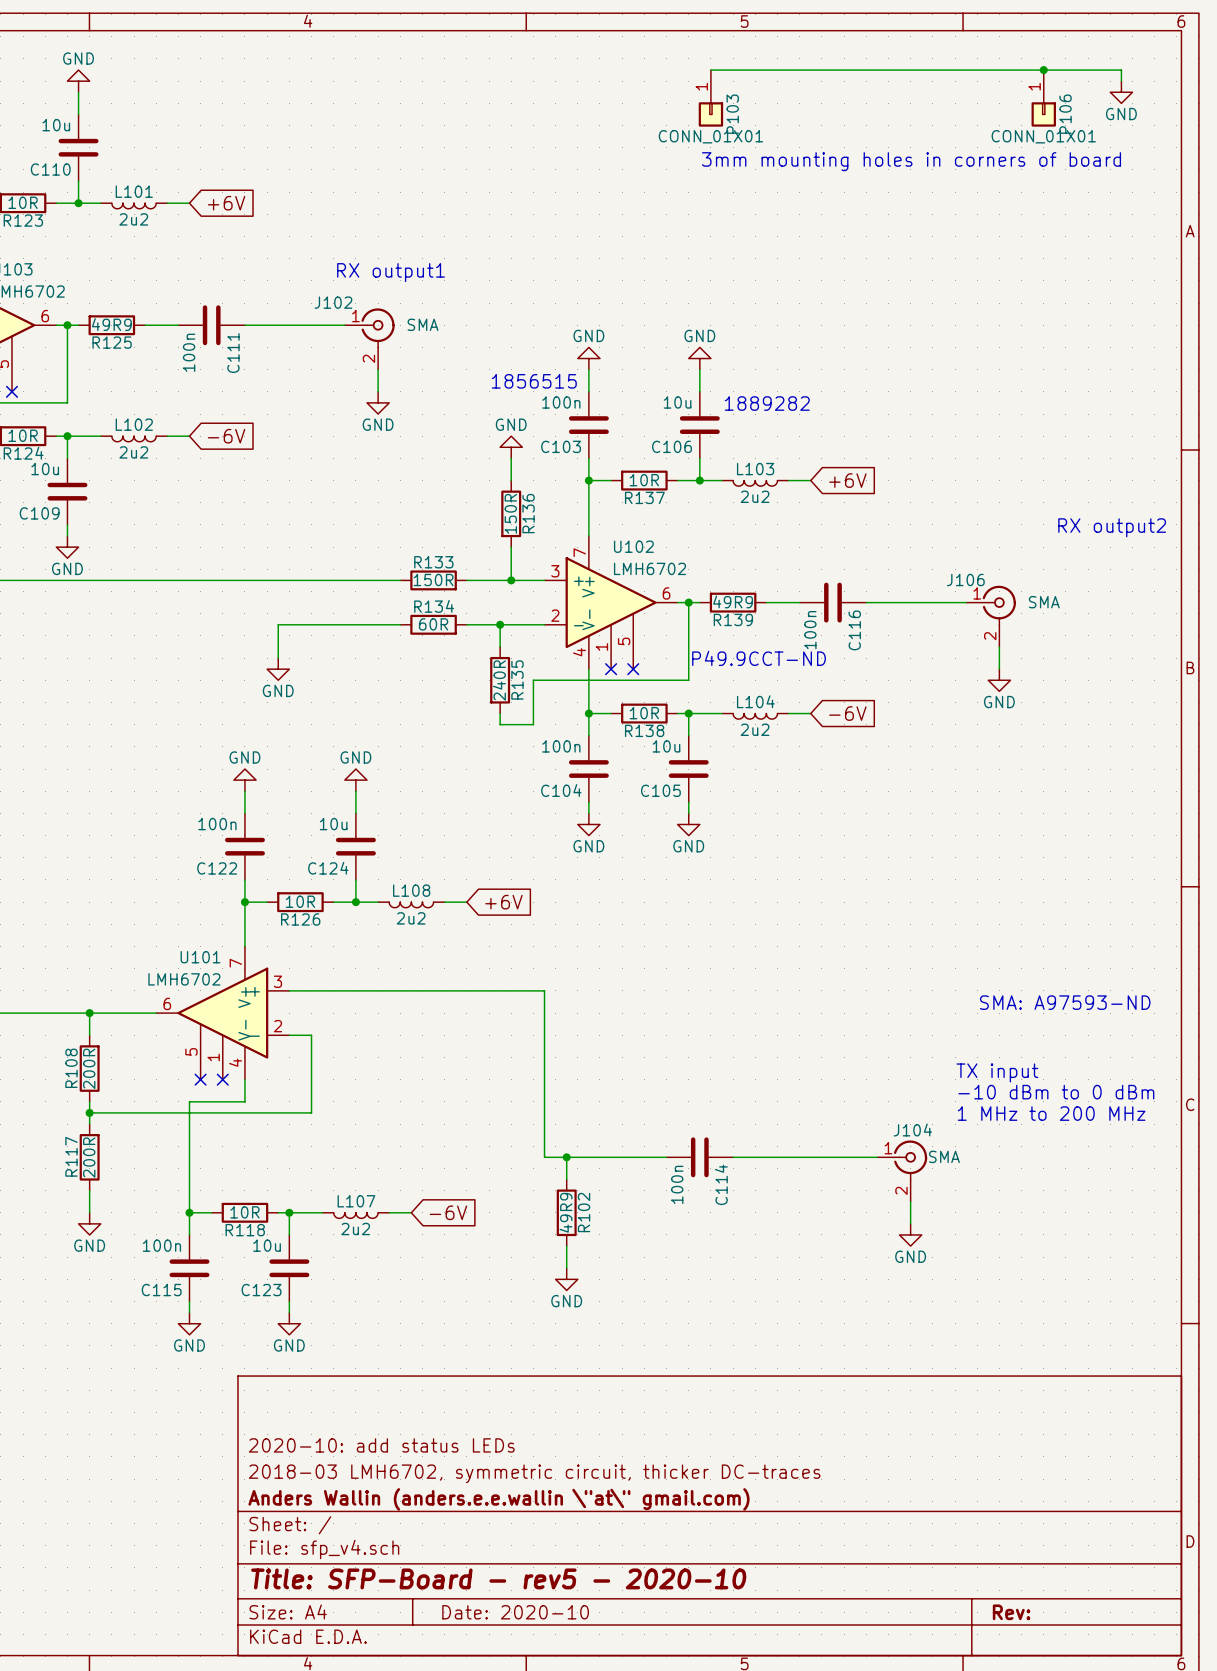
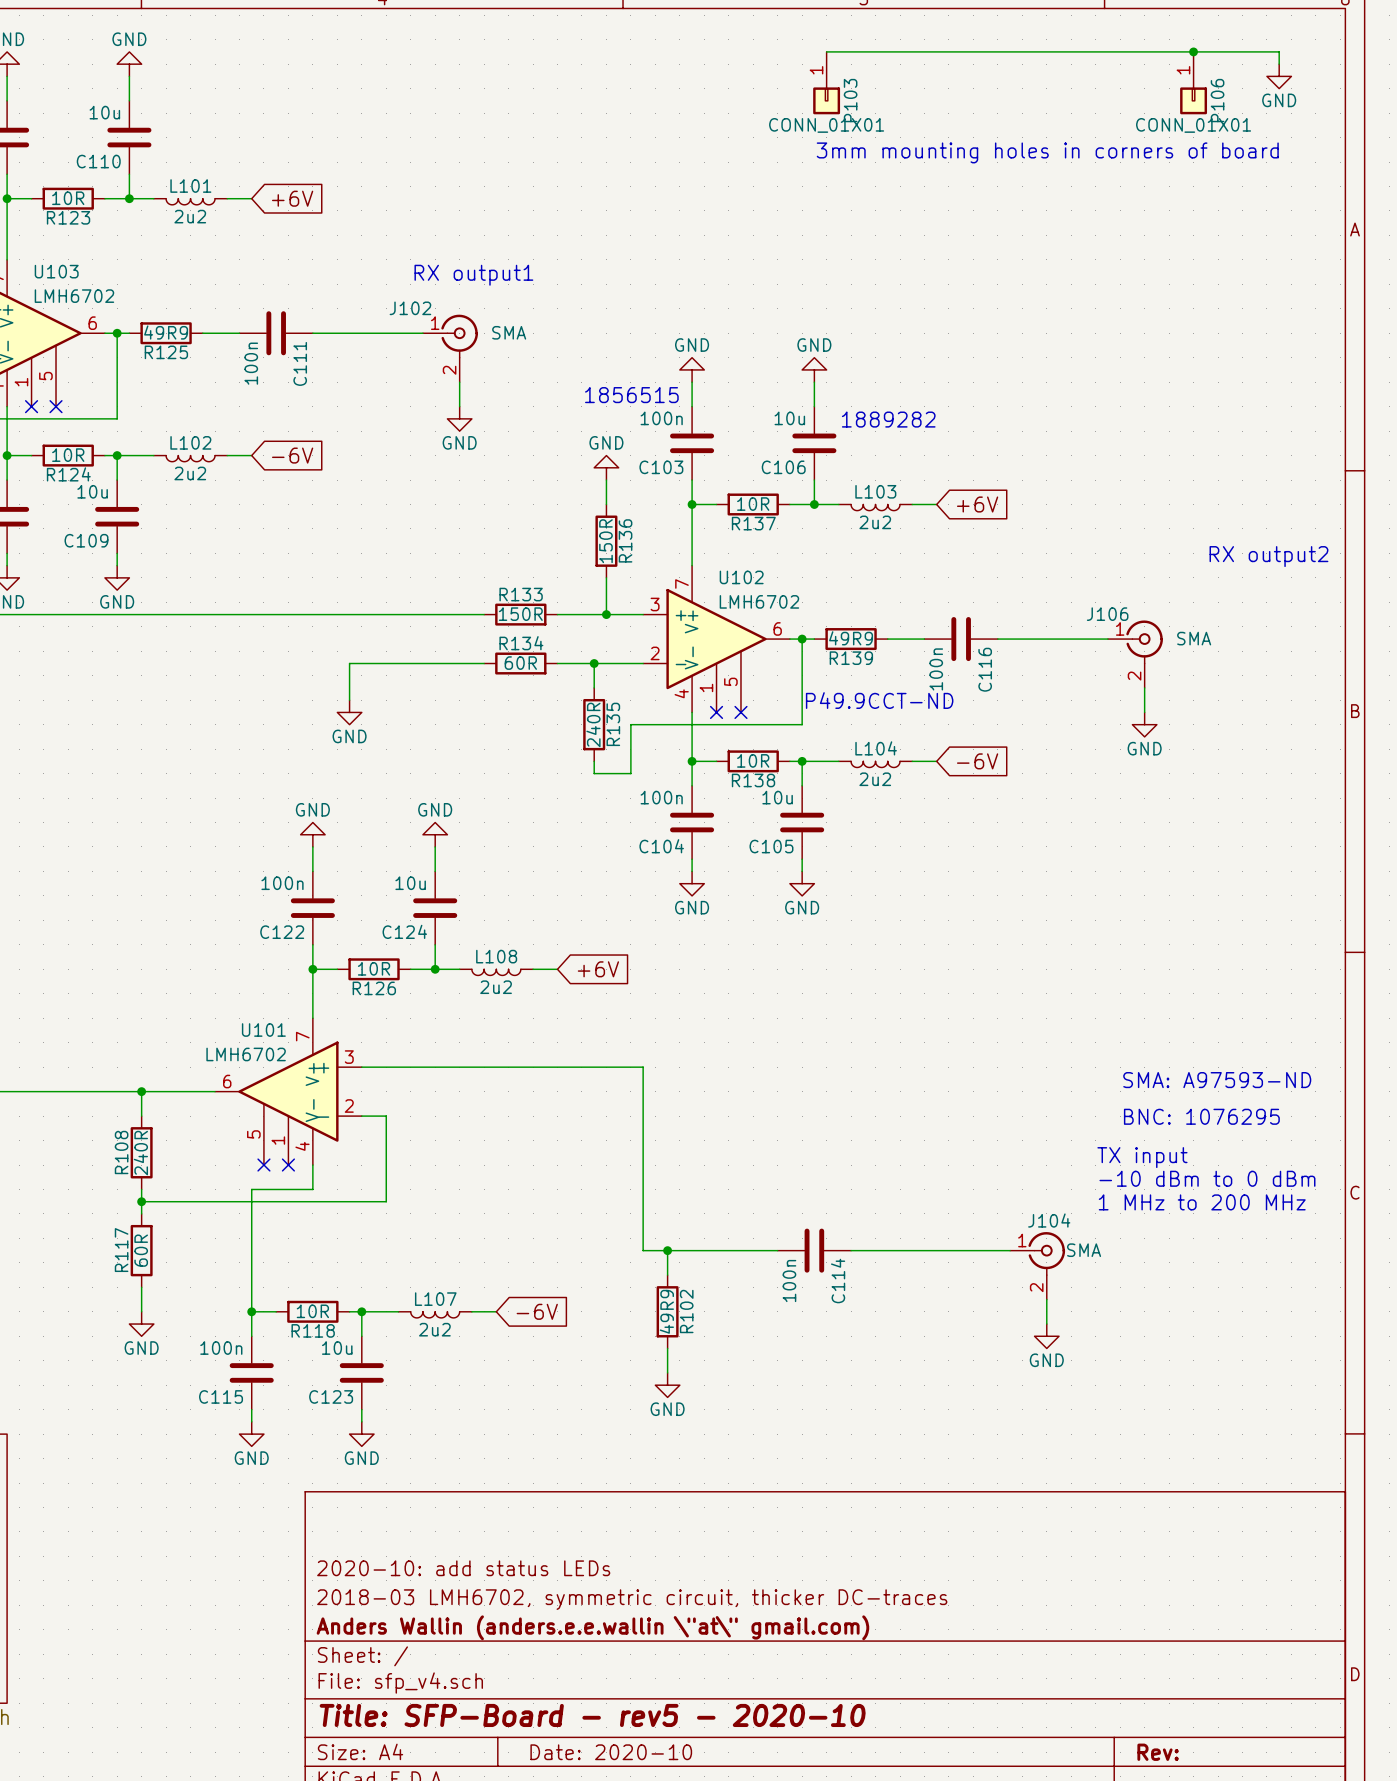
text: none -> BNC: 1076295 (1201, 1116)
R108 value: 200R (89, 1068) -> 240R (140, 1153)
R117 value: 200R (89, 1157) -> 60R (141, 1250)

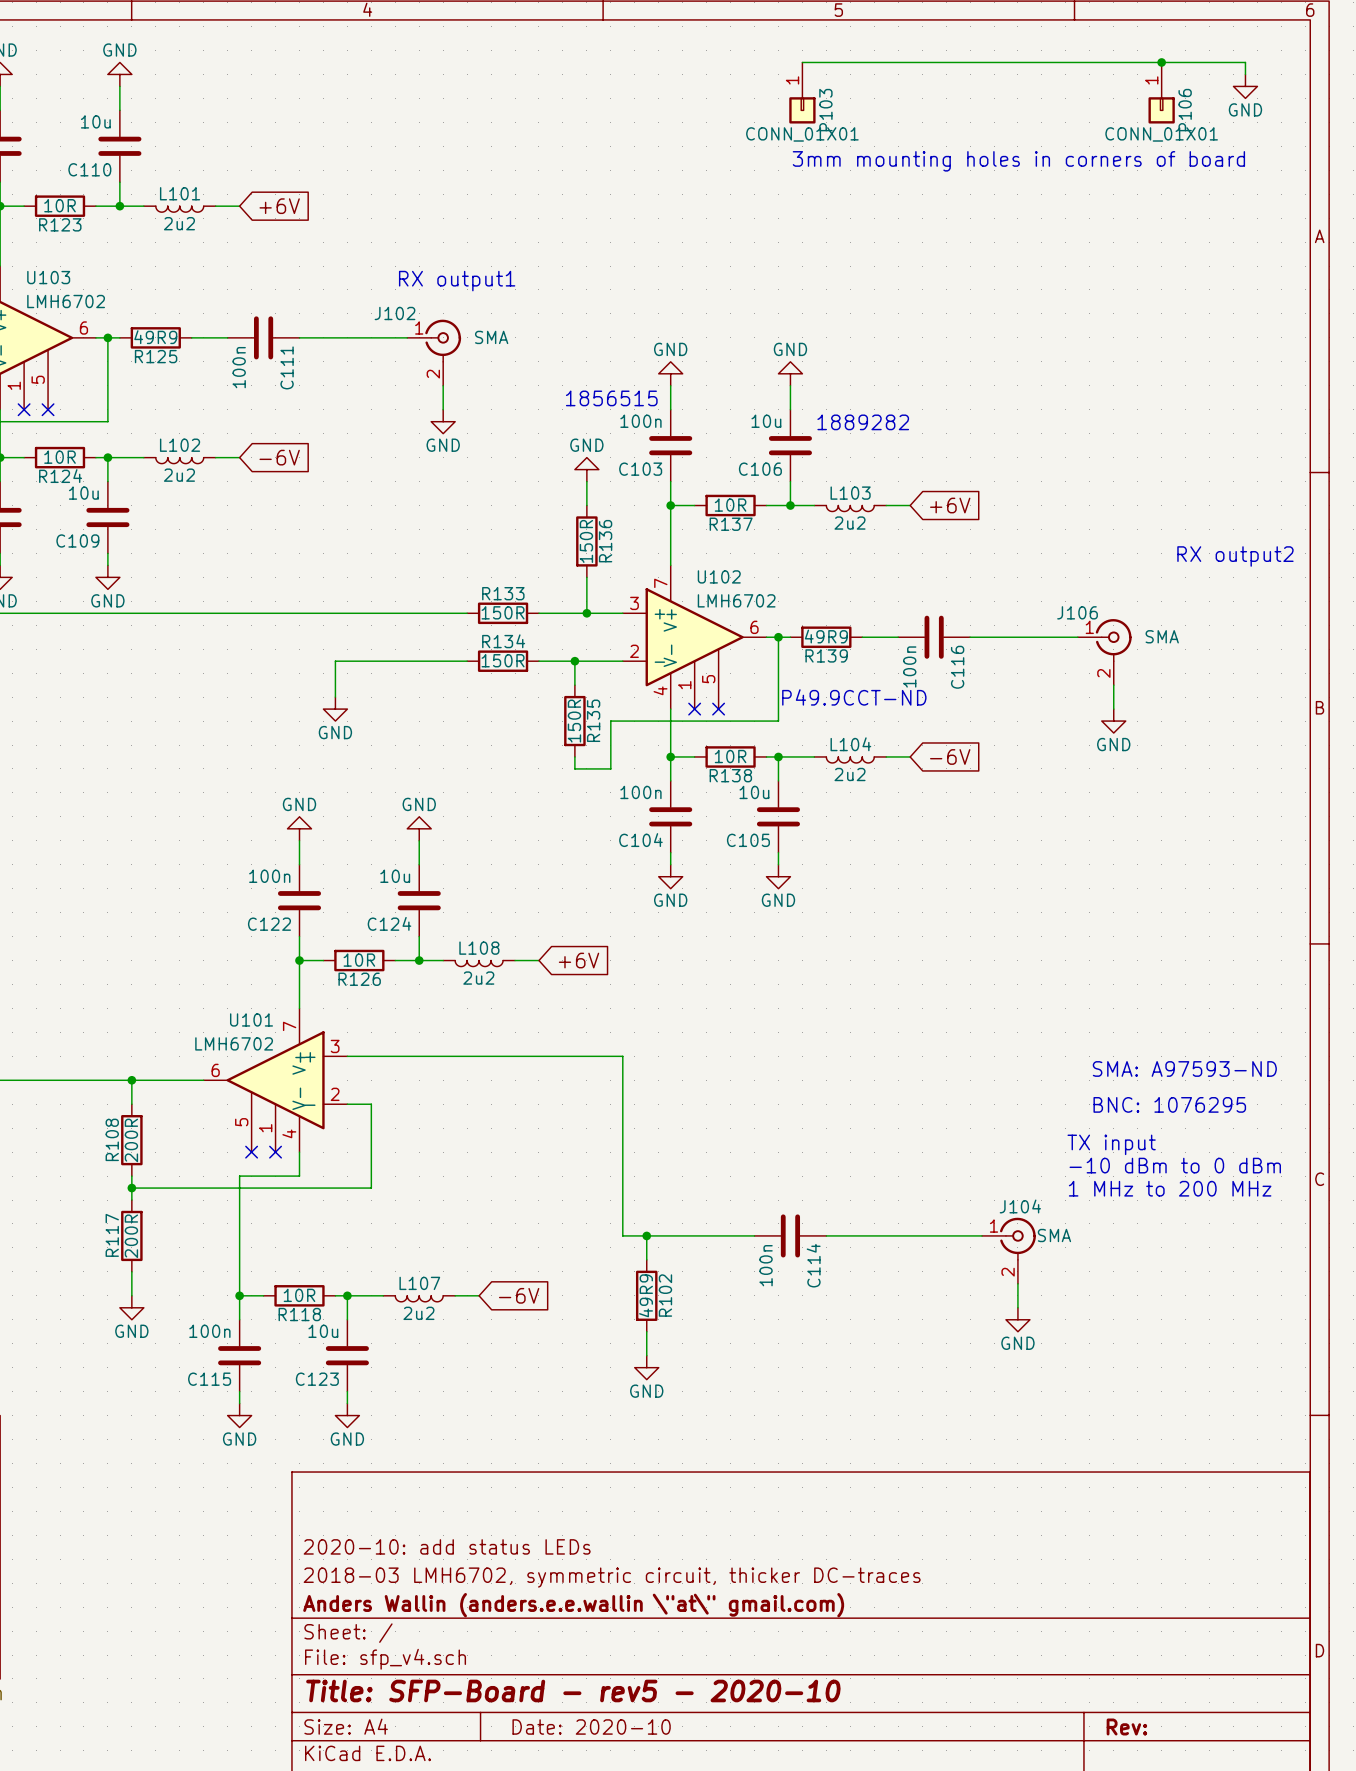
R134 value: 60R (520, 663) -> 150R (503, 660)
R135 value: 240R (593, 724) -> 150R (574, 721)
R108 value: 240R (140, 1153) -> 200R (131, 1140)
R117 value: 60R (141, 1250) -> 200R (131, 1236)

